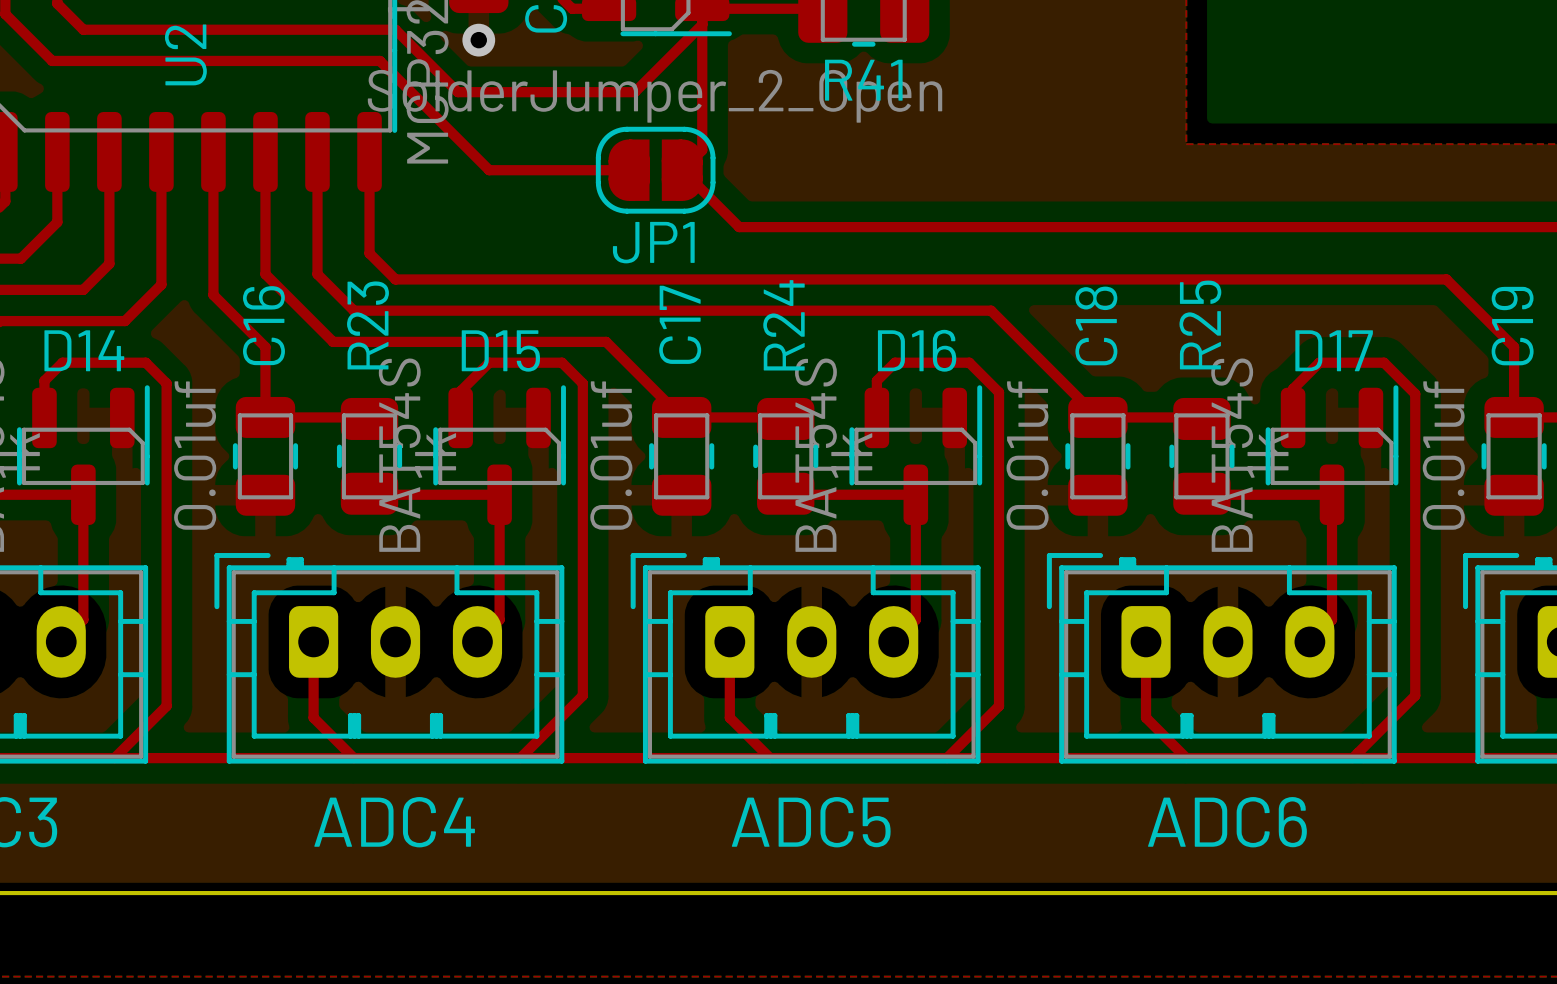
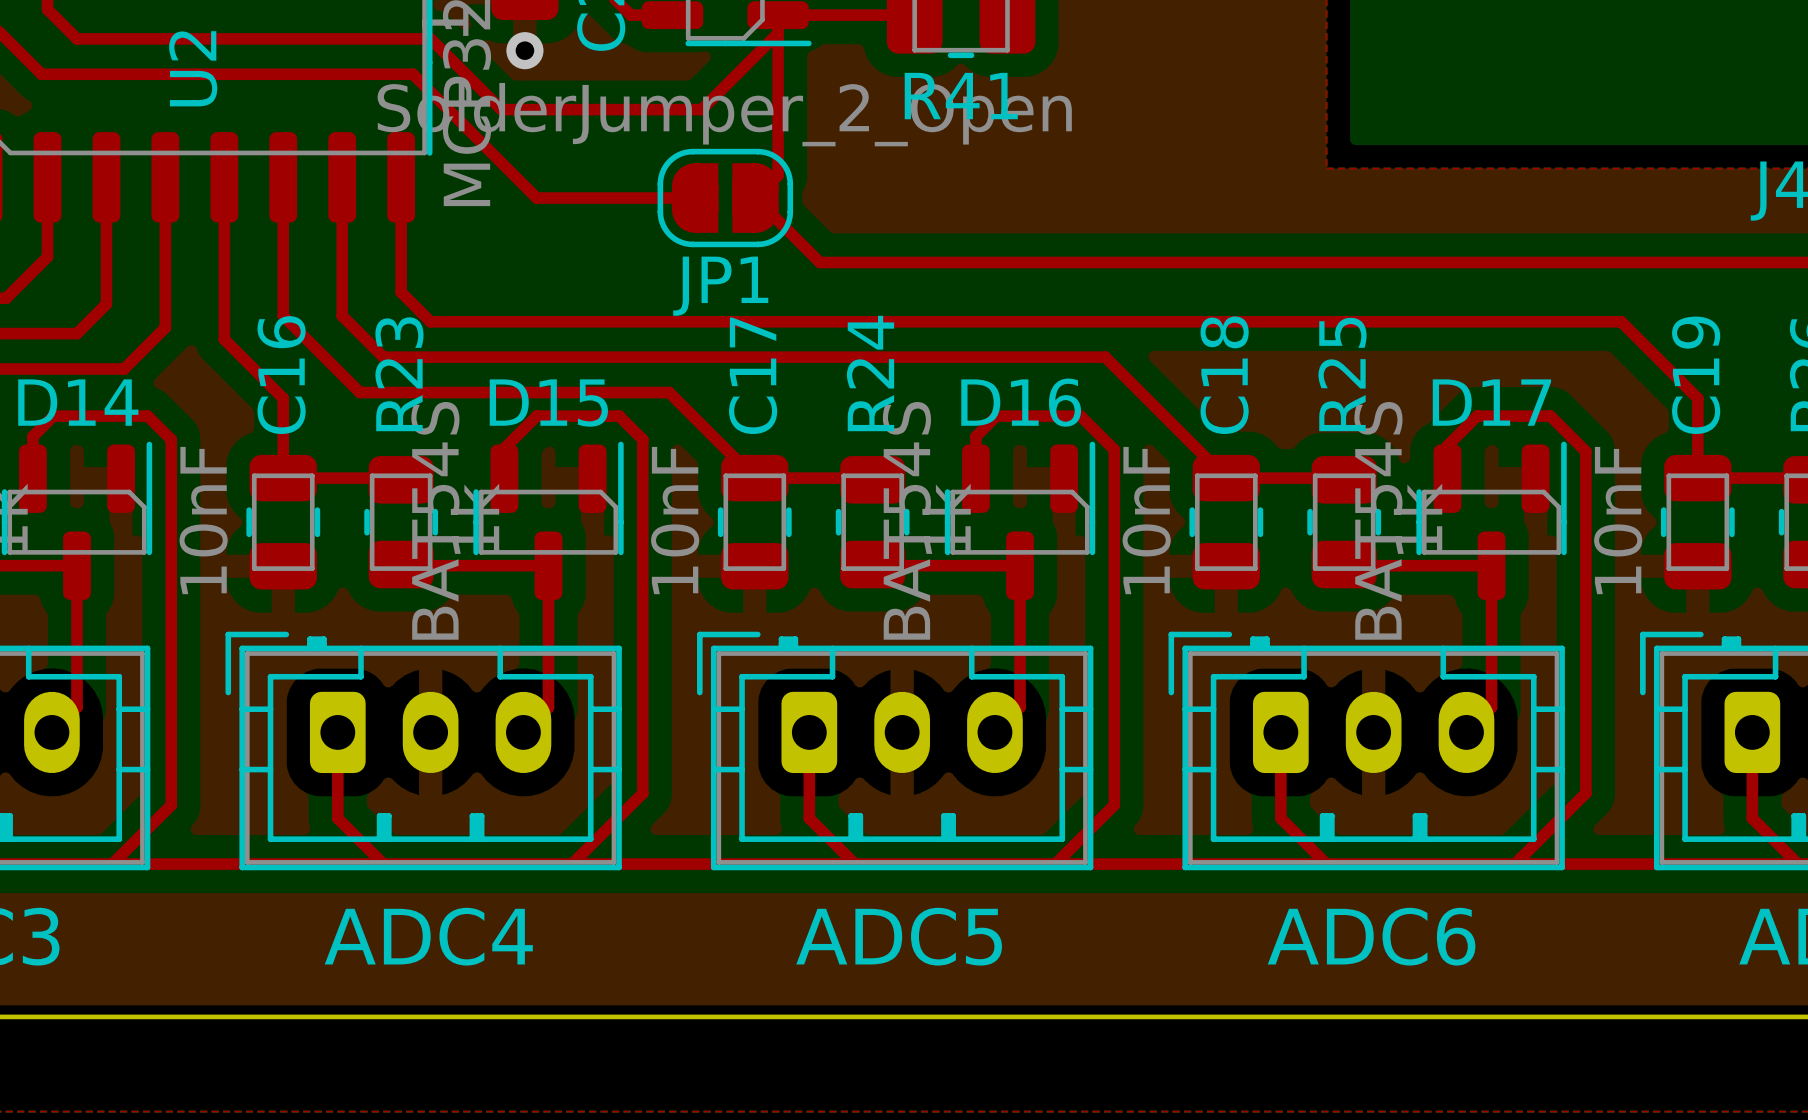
C16 value: 0.01uf (195, 455) -> 10nF (203, 520)
C17 value: 0.01uf (611, 455) -> 10nF (675, 520)
C18 value: 0.01uf (1027, 455) -> 10nF (1146, 520)
C19 value: 0.01uf (1443, 455) -> 10nF (1618, 520)

